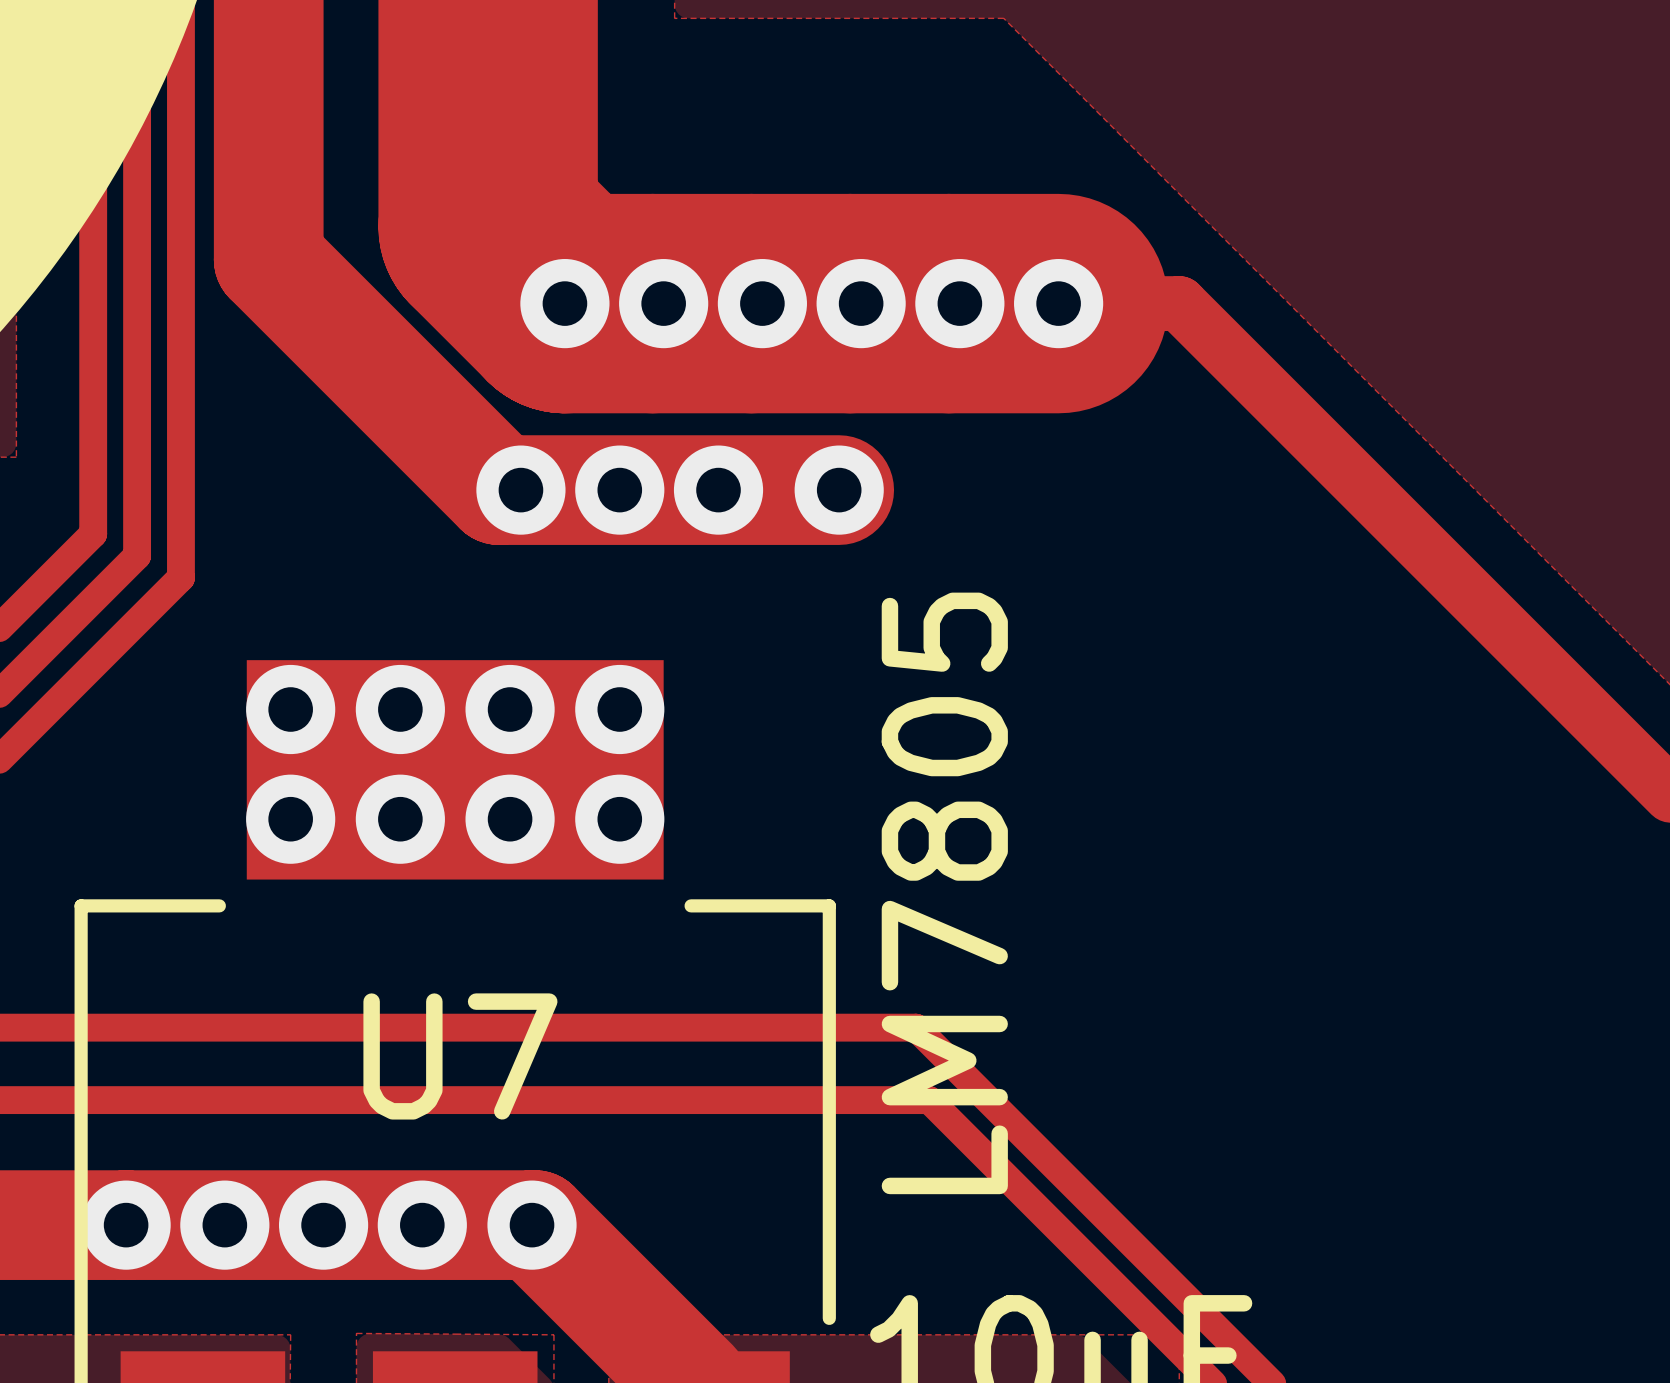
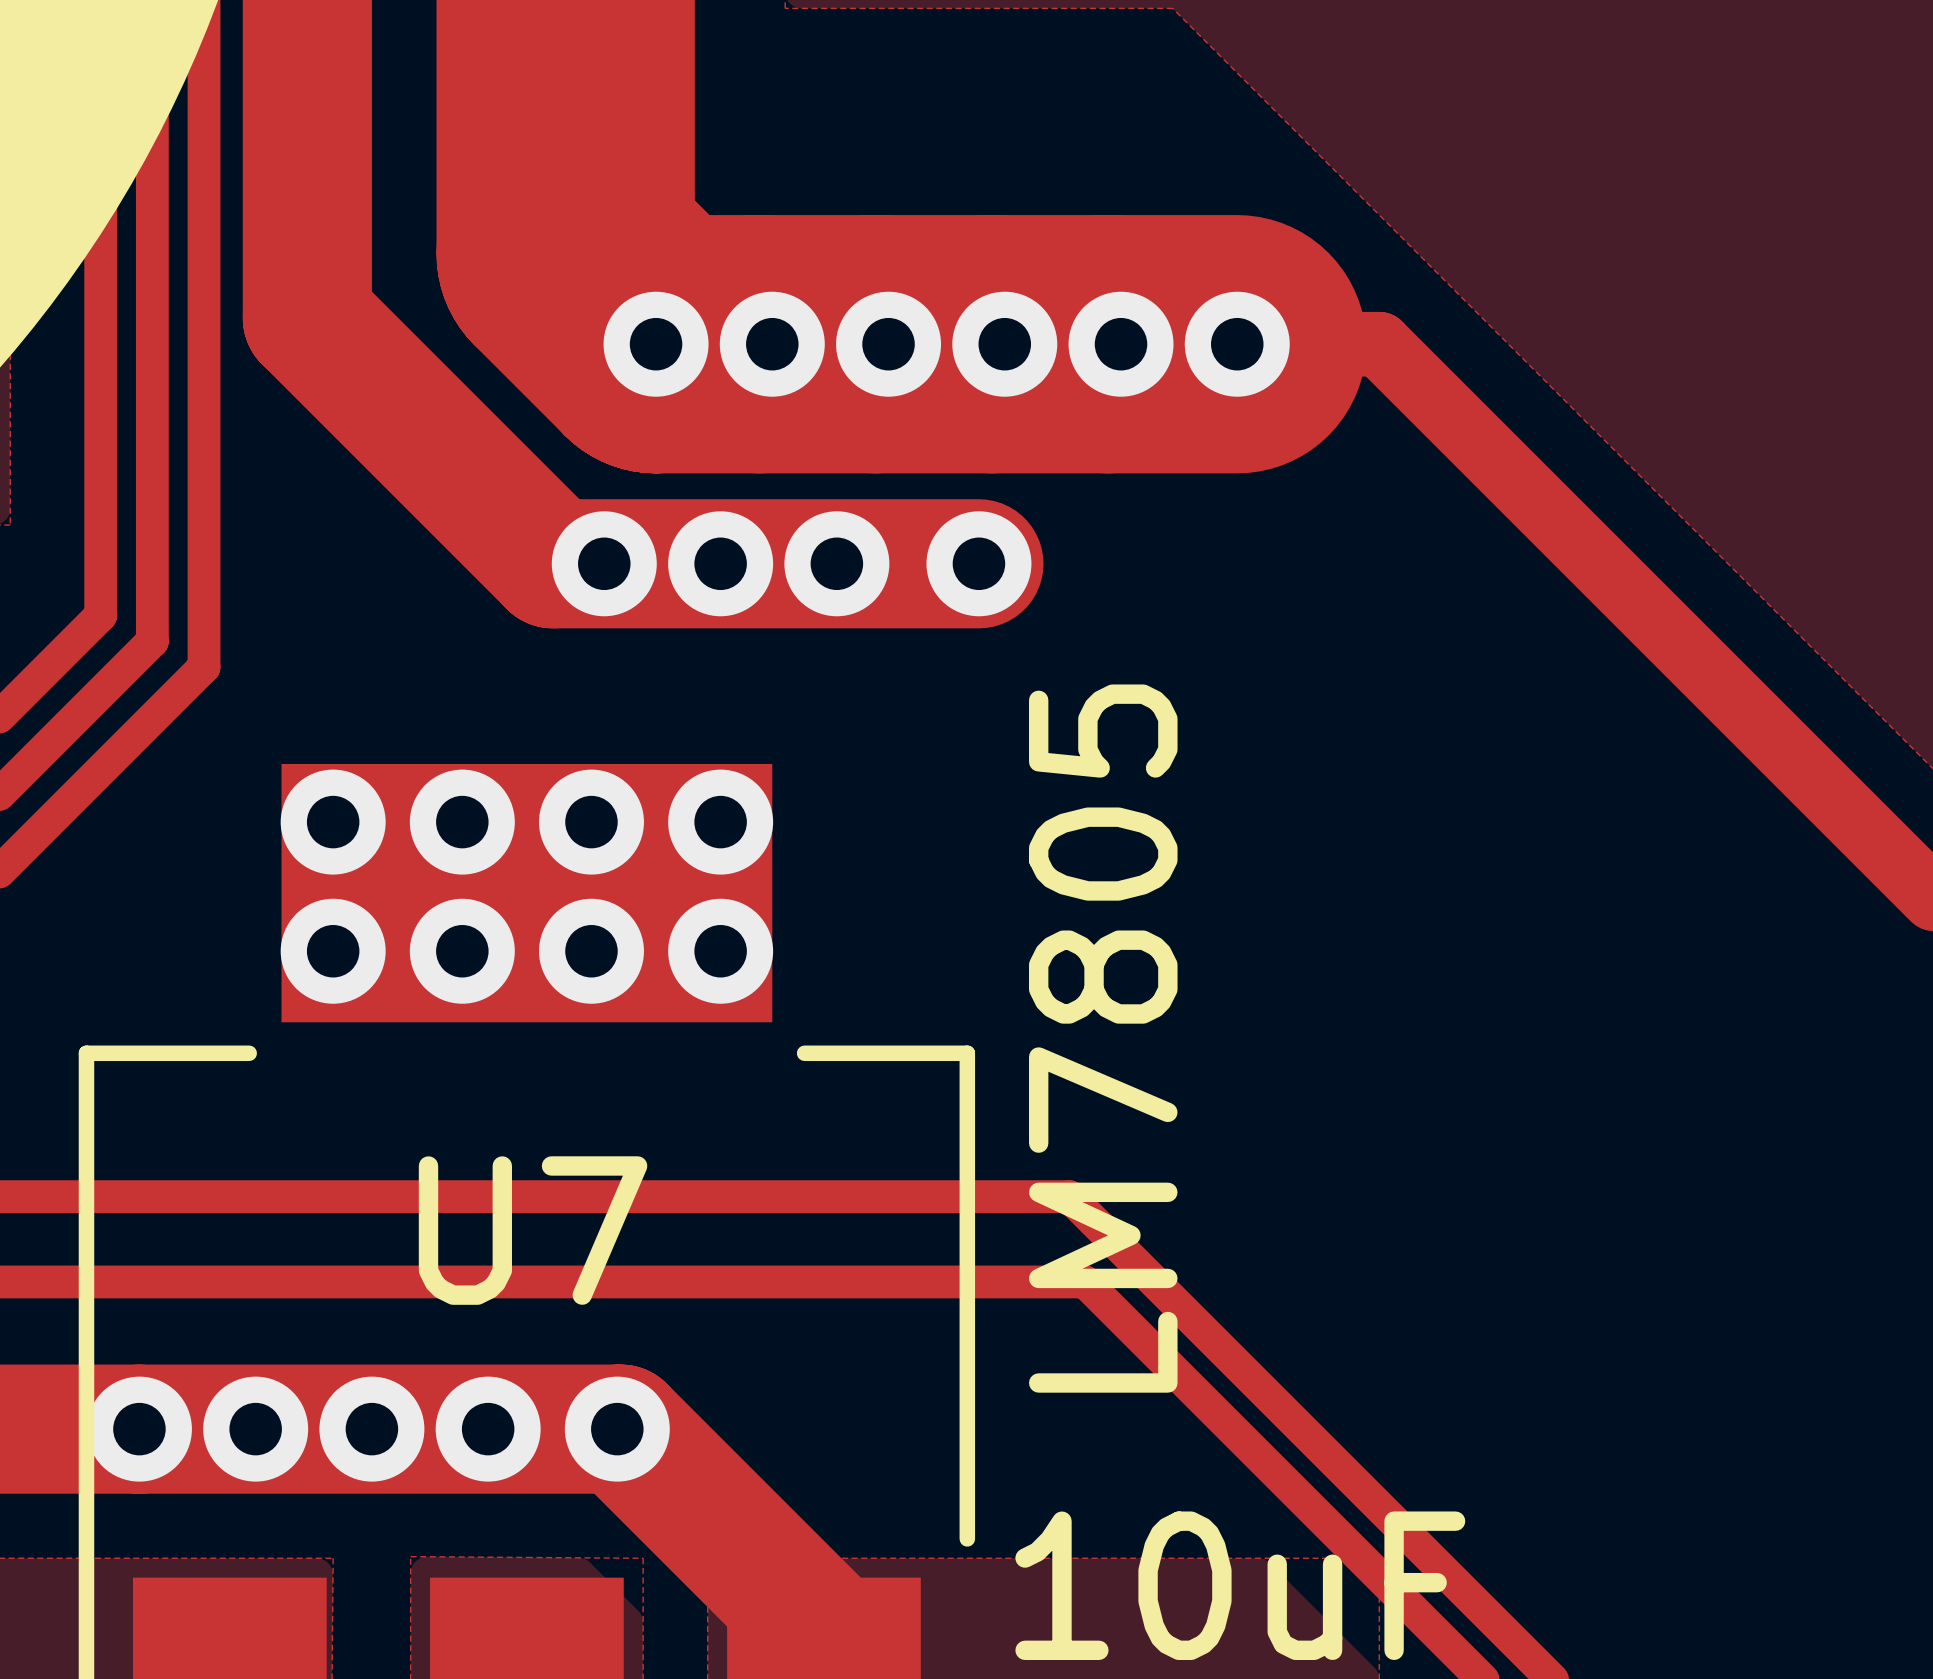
track: (268, 259) (499, 490) -> (307, 292) (307, 318) (552, 563) (578, 563)

